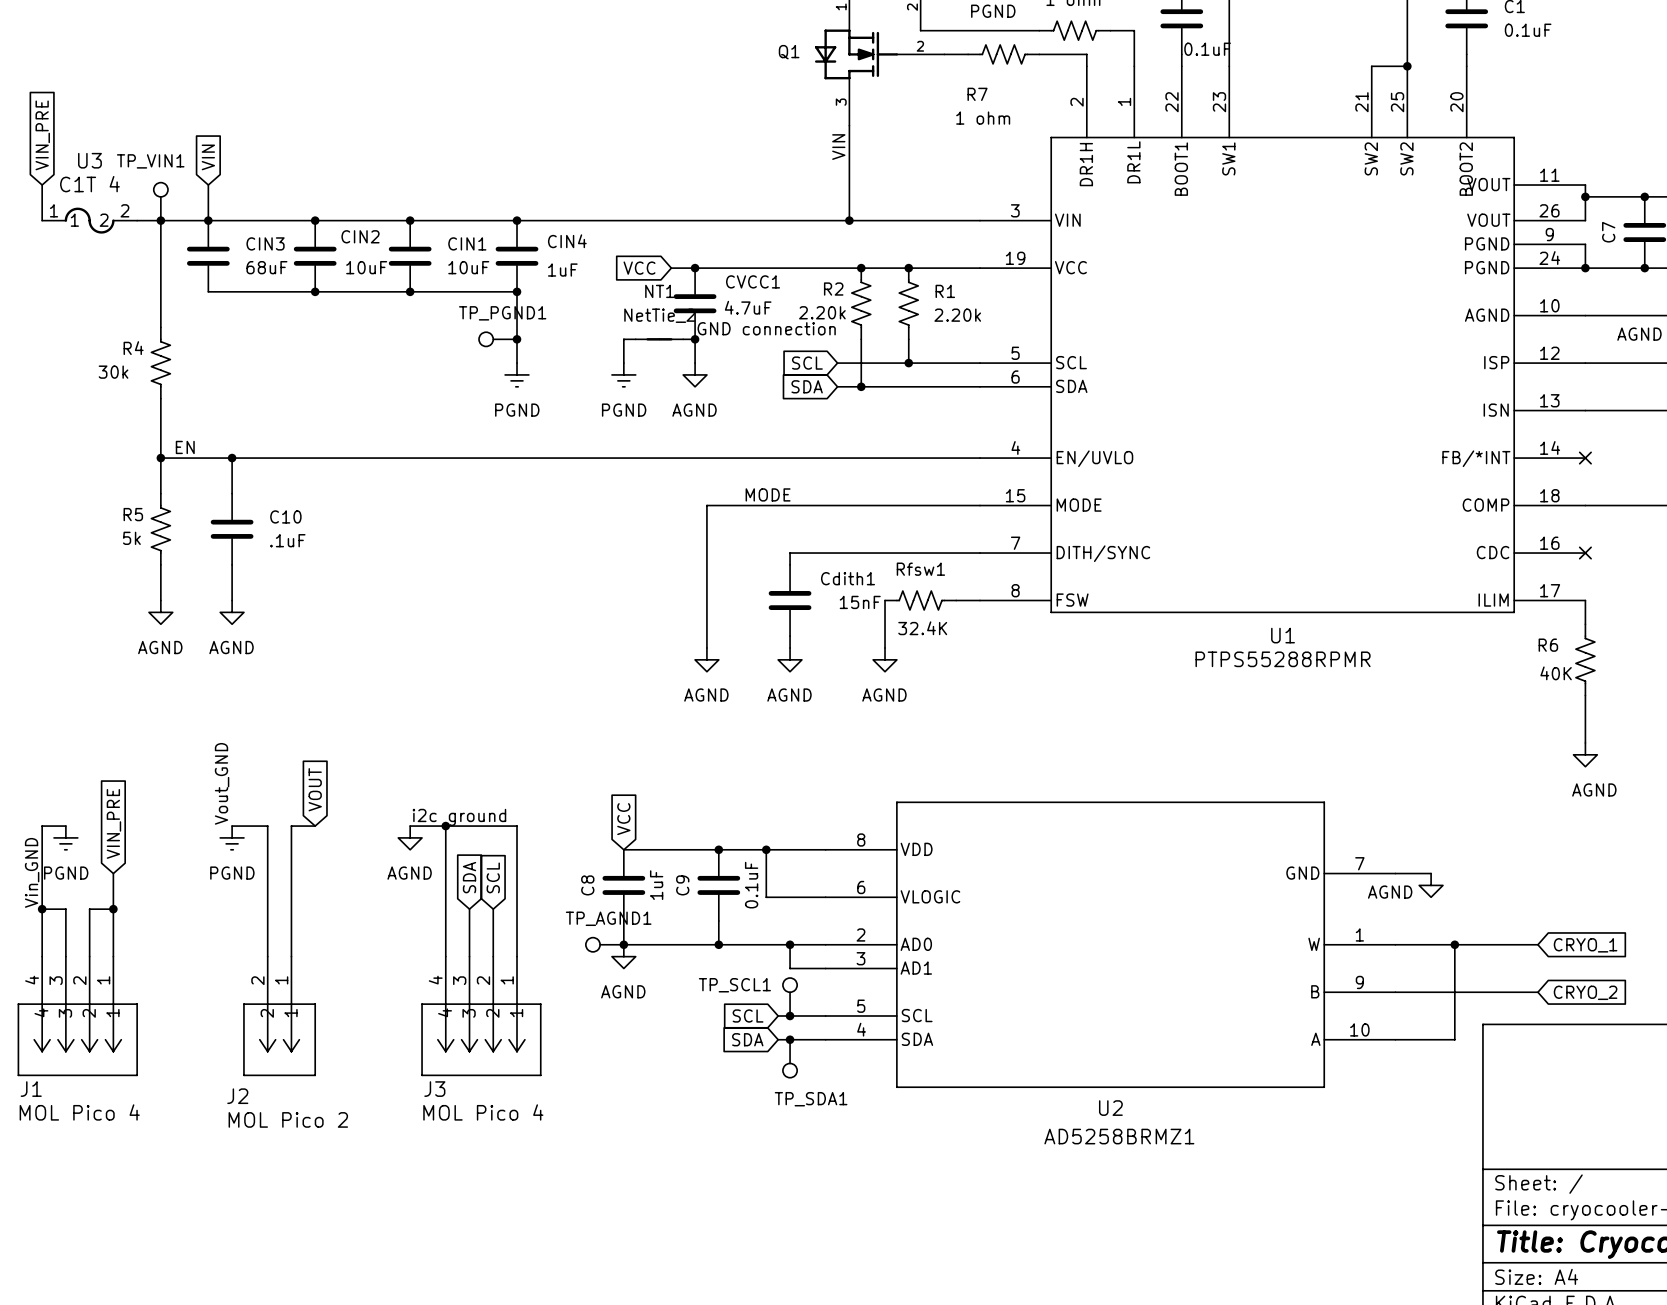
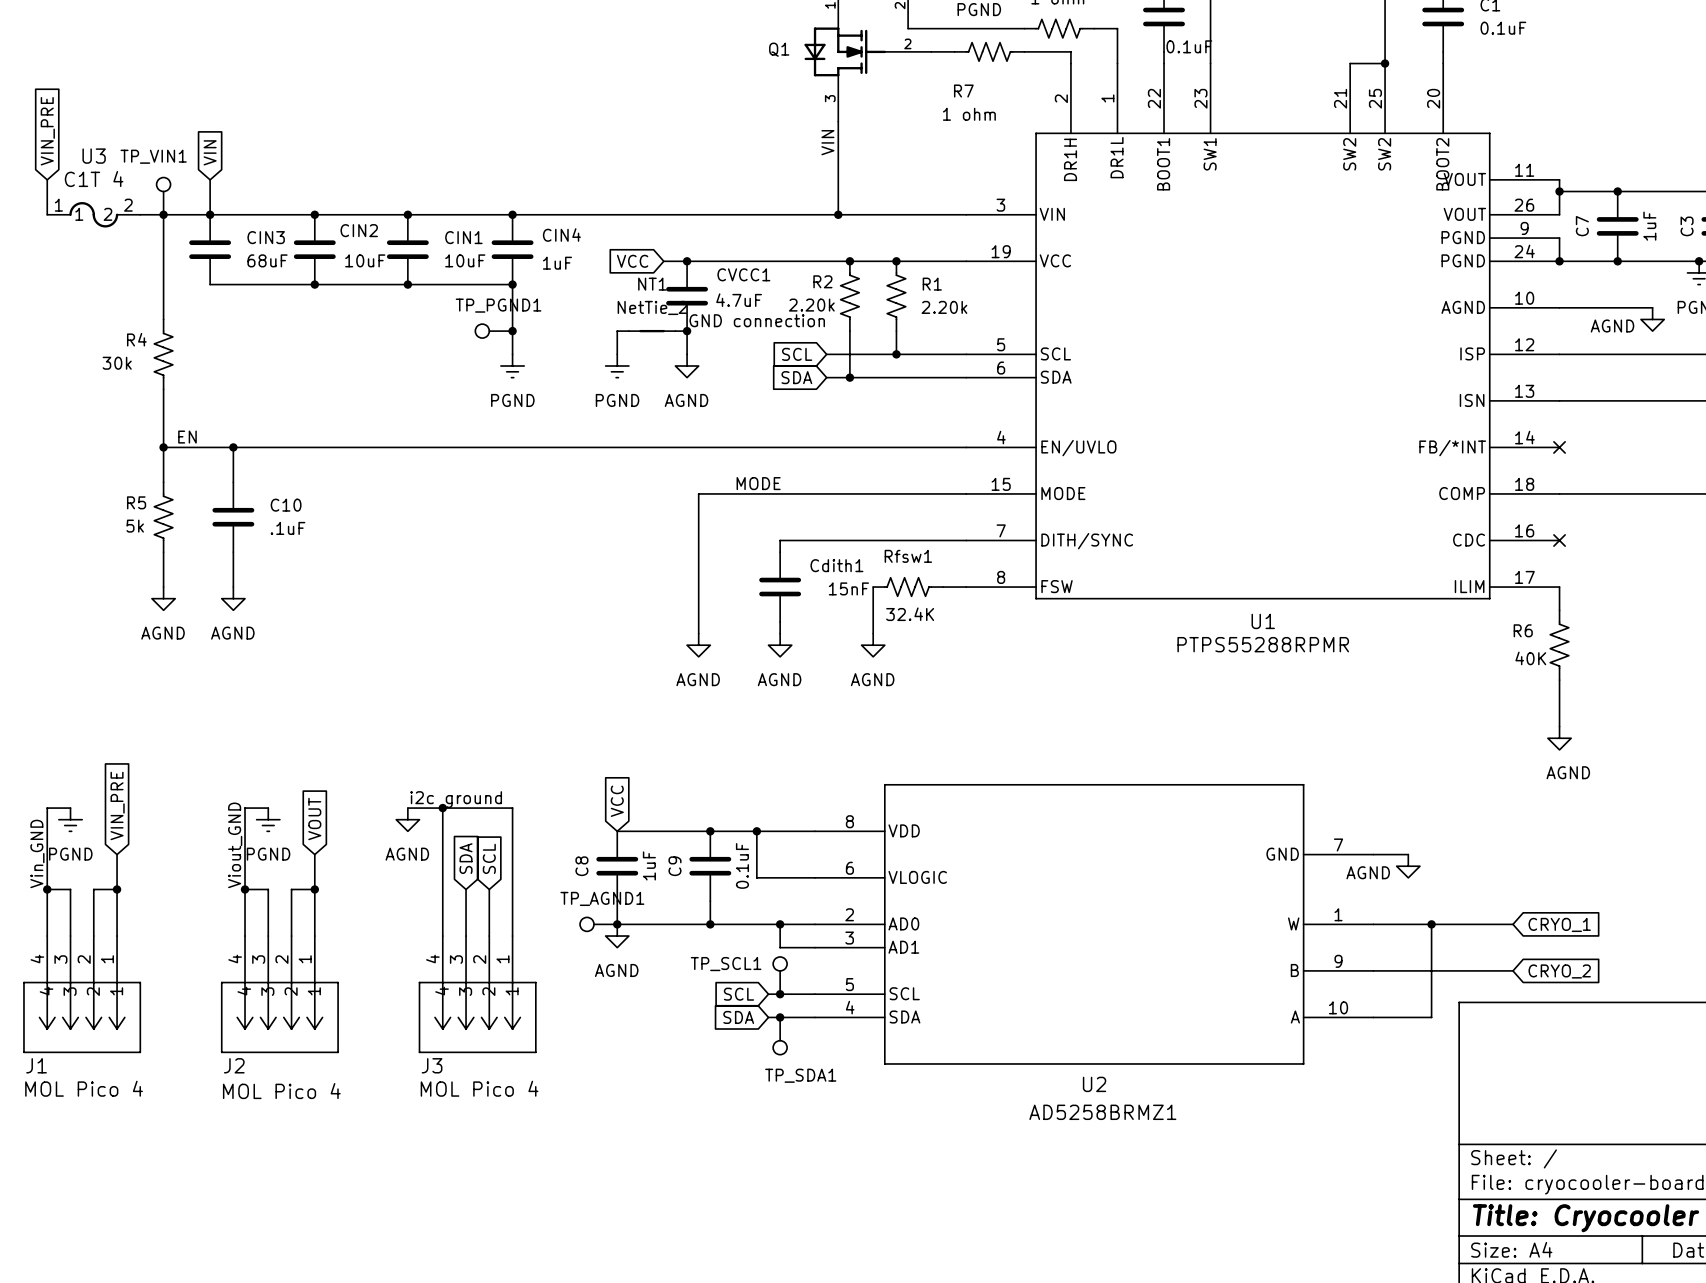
label: Vout_GND (222, 783) -> Viout_GND (235, 845)
global label position: VOUT (315, 789) -> VOUT (314, 818)
wire: (232, 826) (243, 826) -> (245, 936) (245, 808)
wire: (267, 826) (267, 909) -> (245, 889) (268, 889)
wire: (315, 826) (291, 826) (291, 909) -> (314, 889) (291, 889)
power symbol position: PGND (232, 837) -> PGND (268, 819)
wire: none -> (314, 854) (314, 936)
junction: none -> (245, 889)
junction: none -> (314, 889)
J2 symbol: [243, 956, 316, 1076] -> [221, 936, 339, 1053]
J2 value: MOL Pico 2 (288, 1119) -> MOL Pico 4 (281, 1091)

